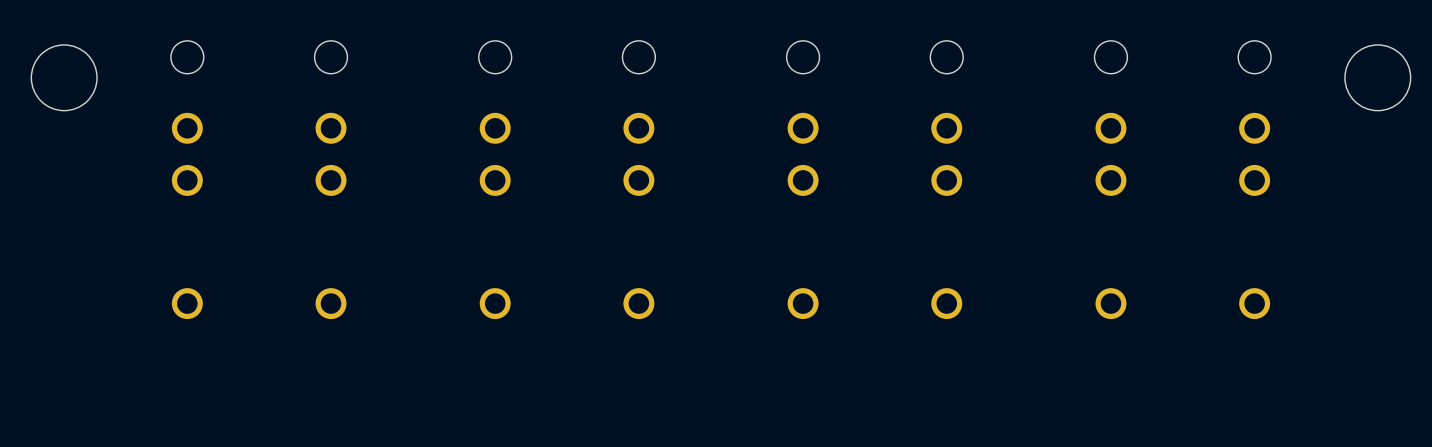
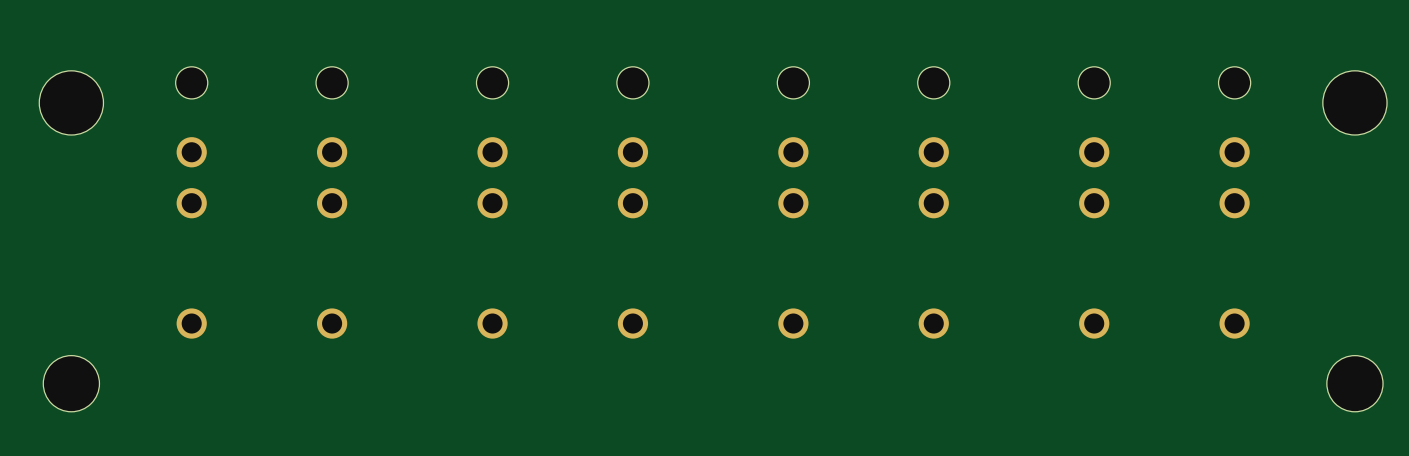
hole: none -> (71, 383)
hole: none -> (1354, 383)

